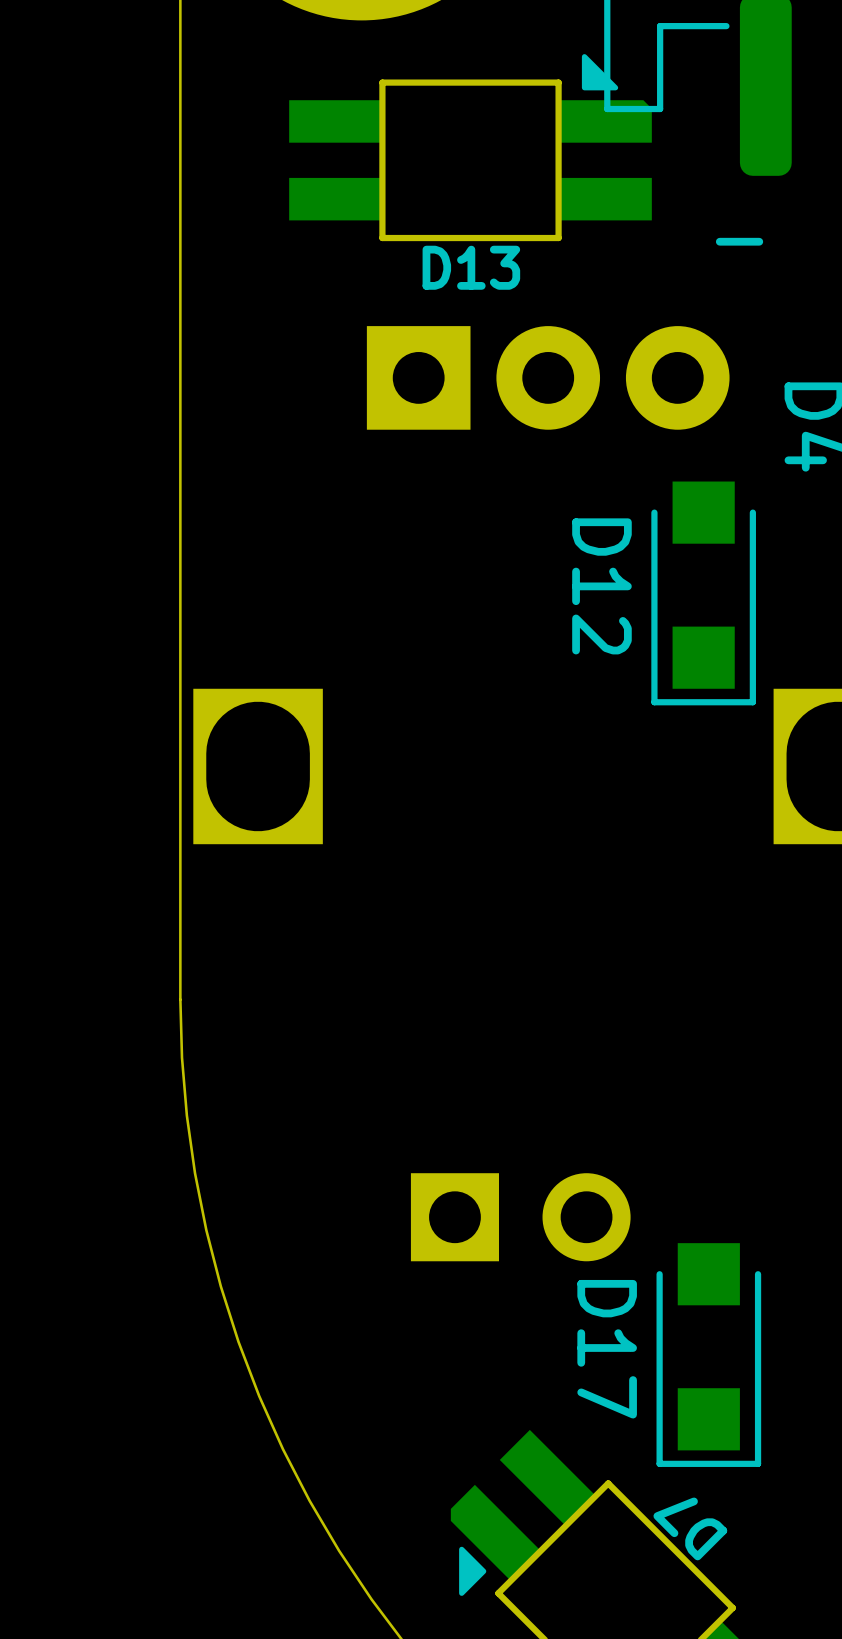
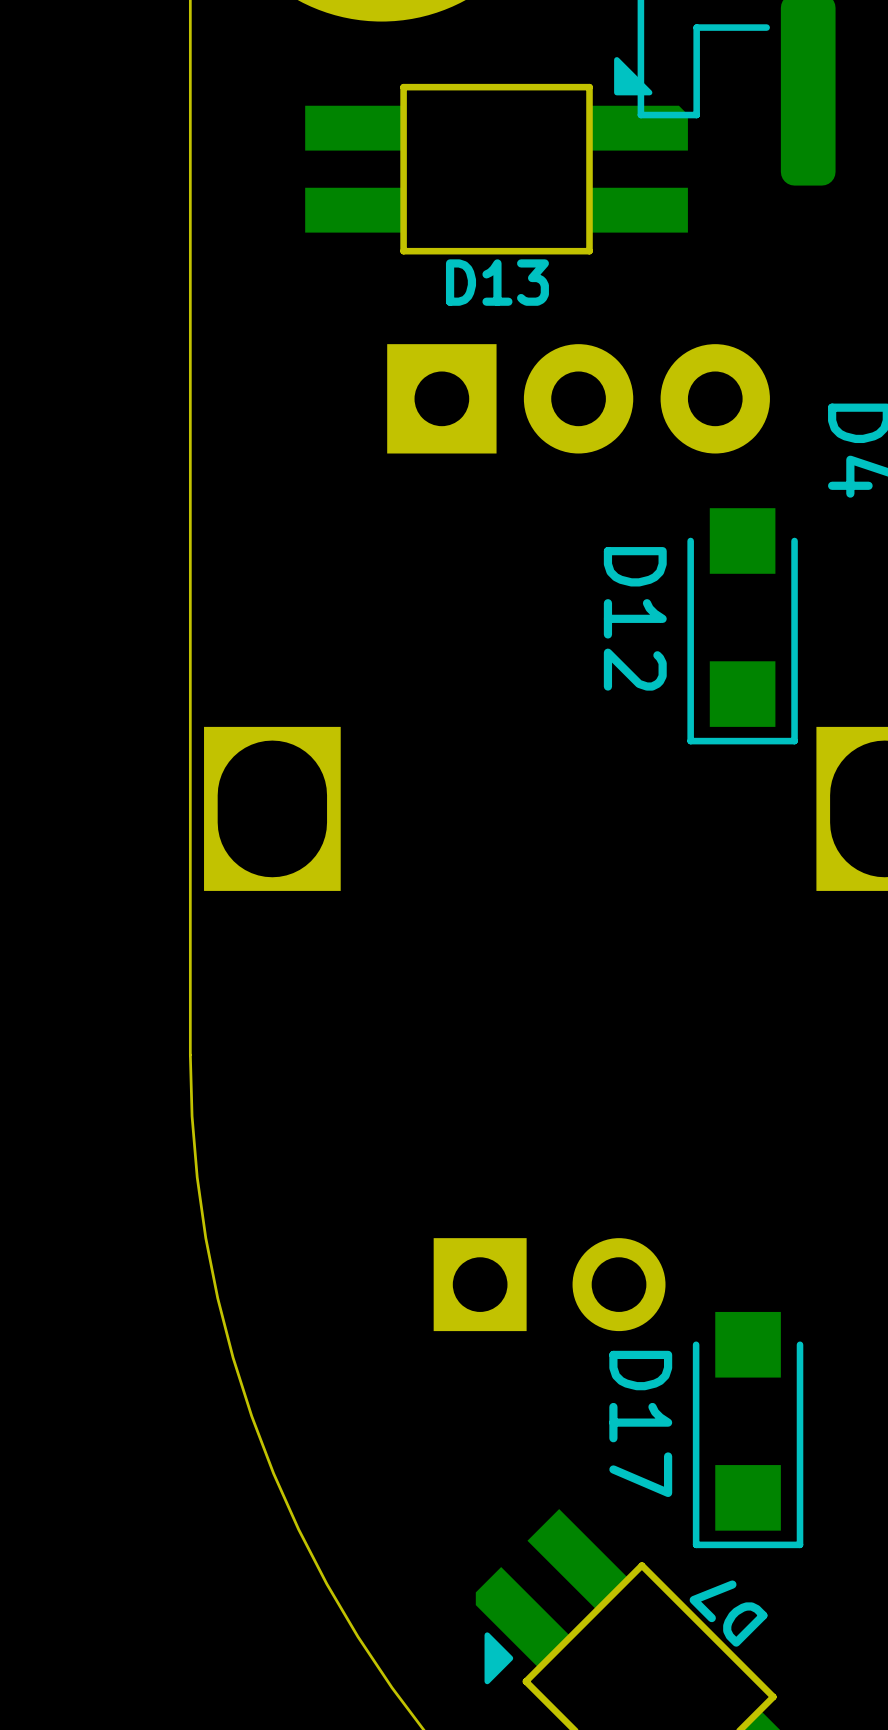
text: - (739, 241) -> none

